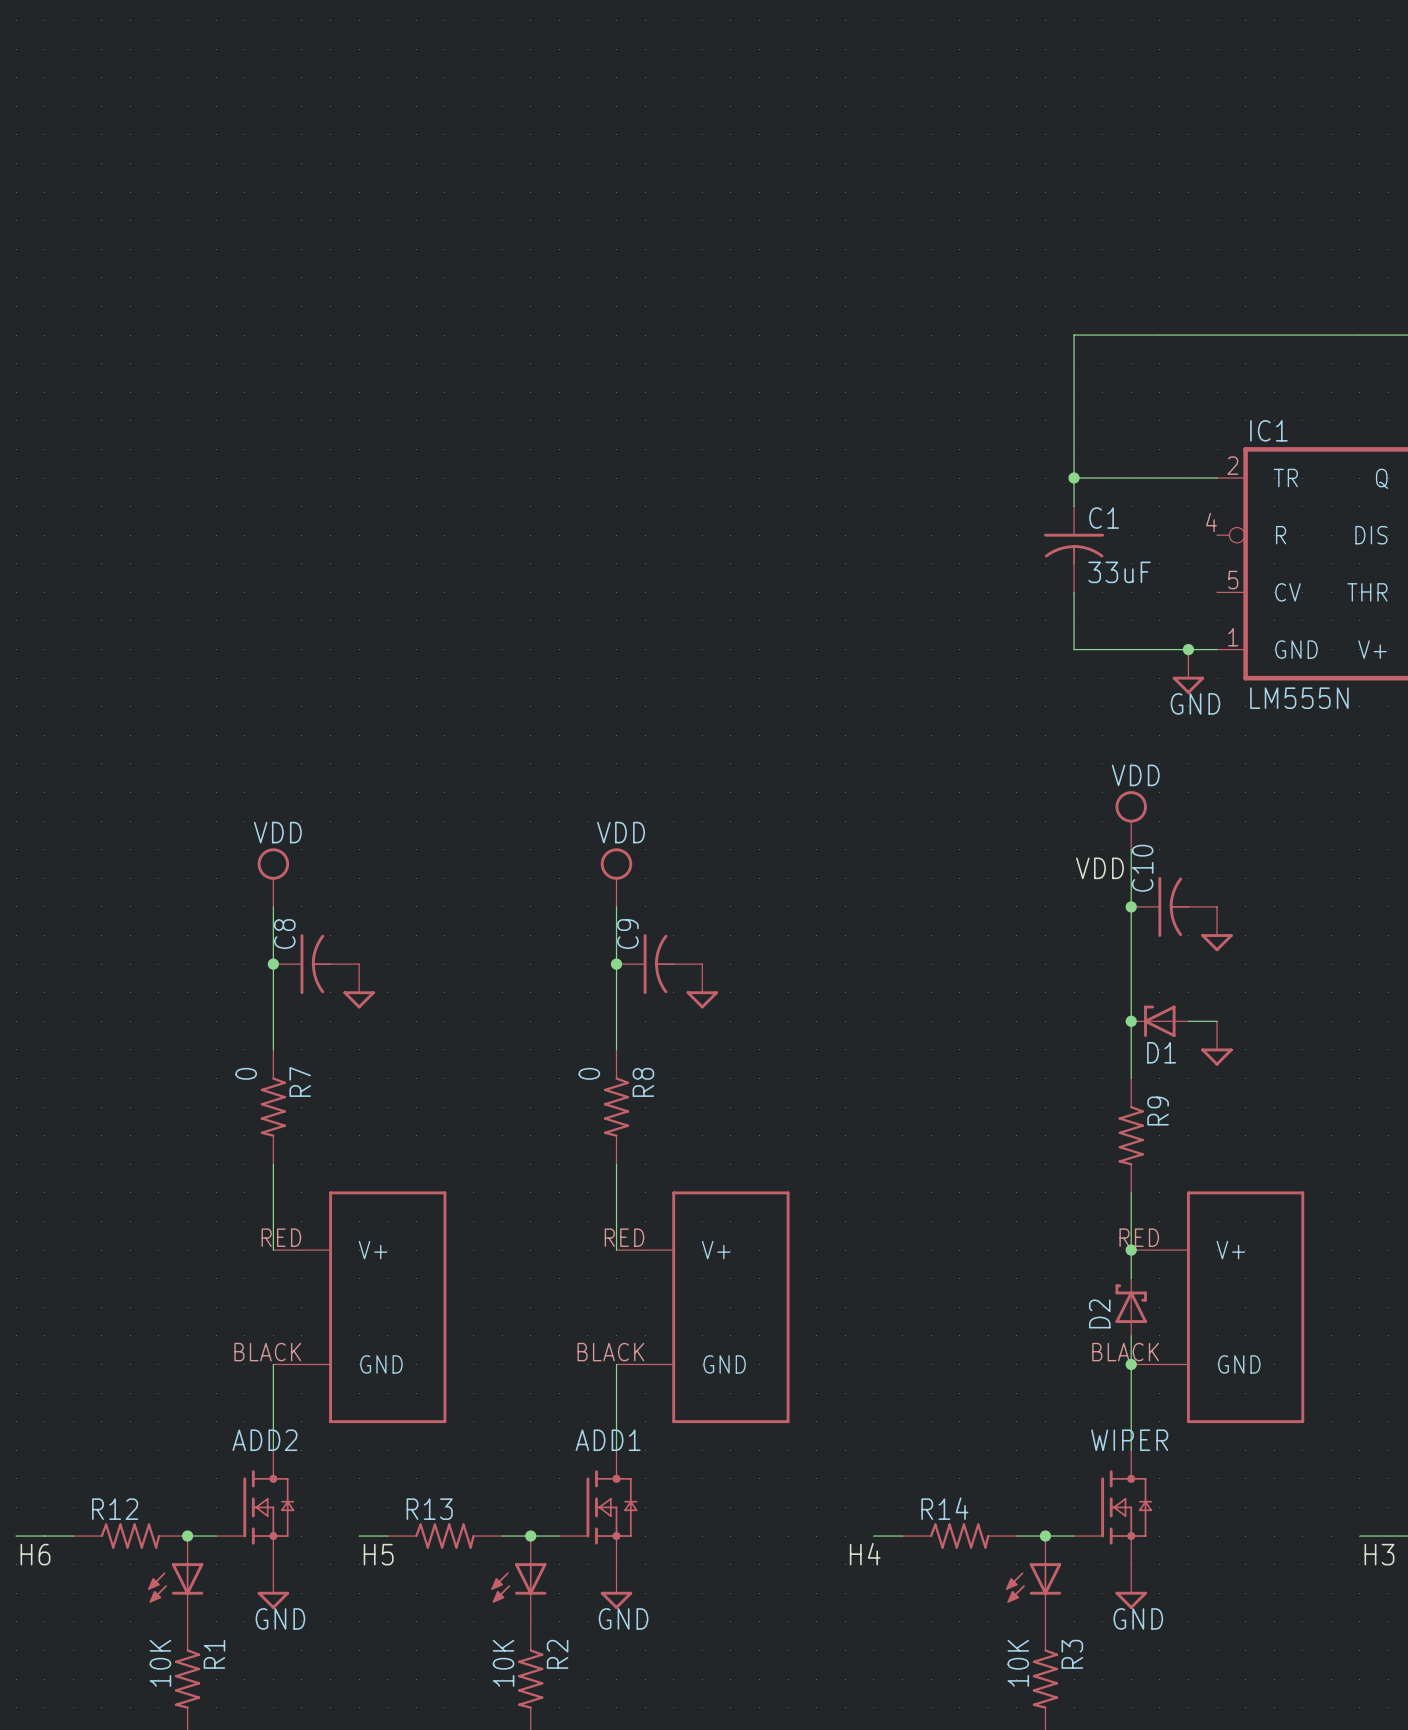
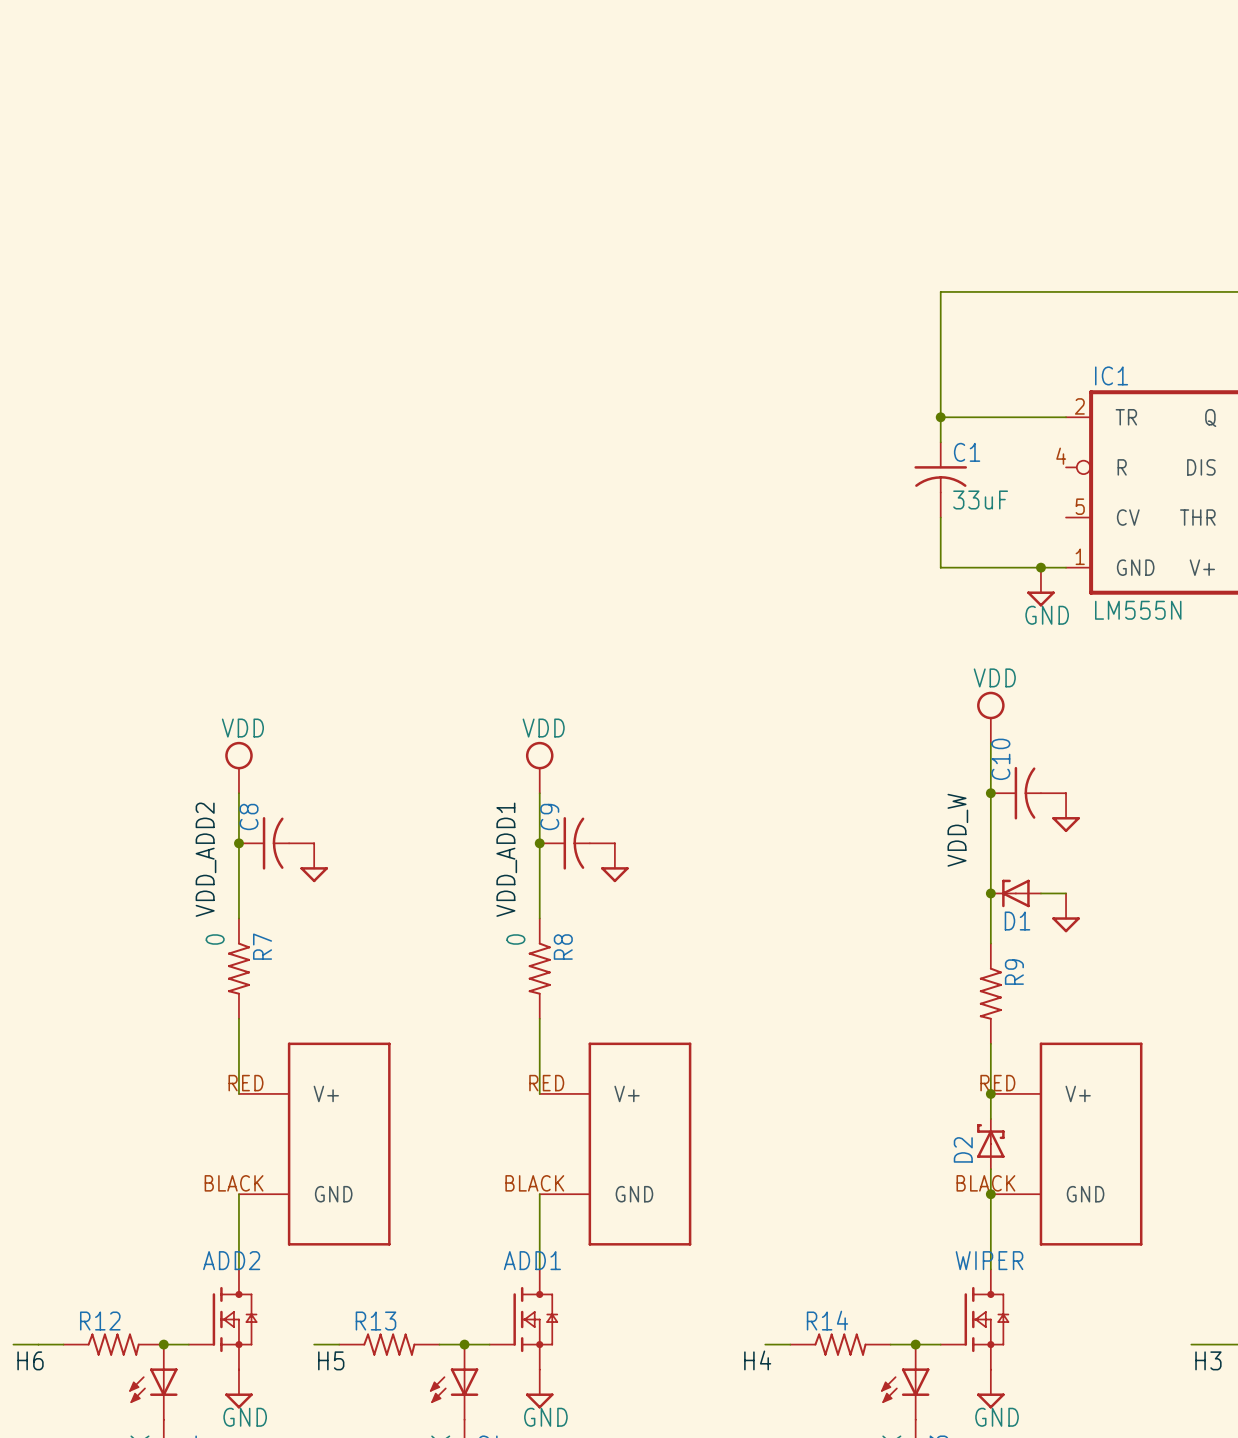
label: VDD (1099, 868) -> VDD_W (957, 830)
label: none -> VDD_ADD2 (205, 859)
label: none -> VDD_ADD1 (506, 859)

